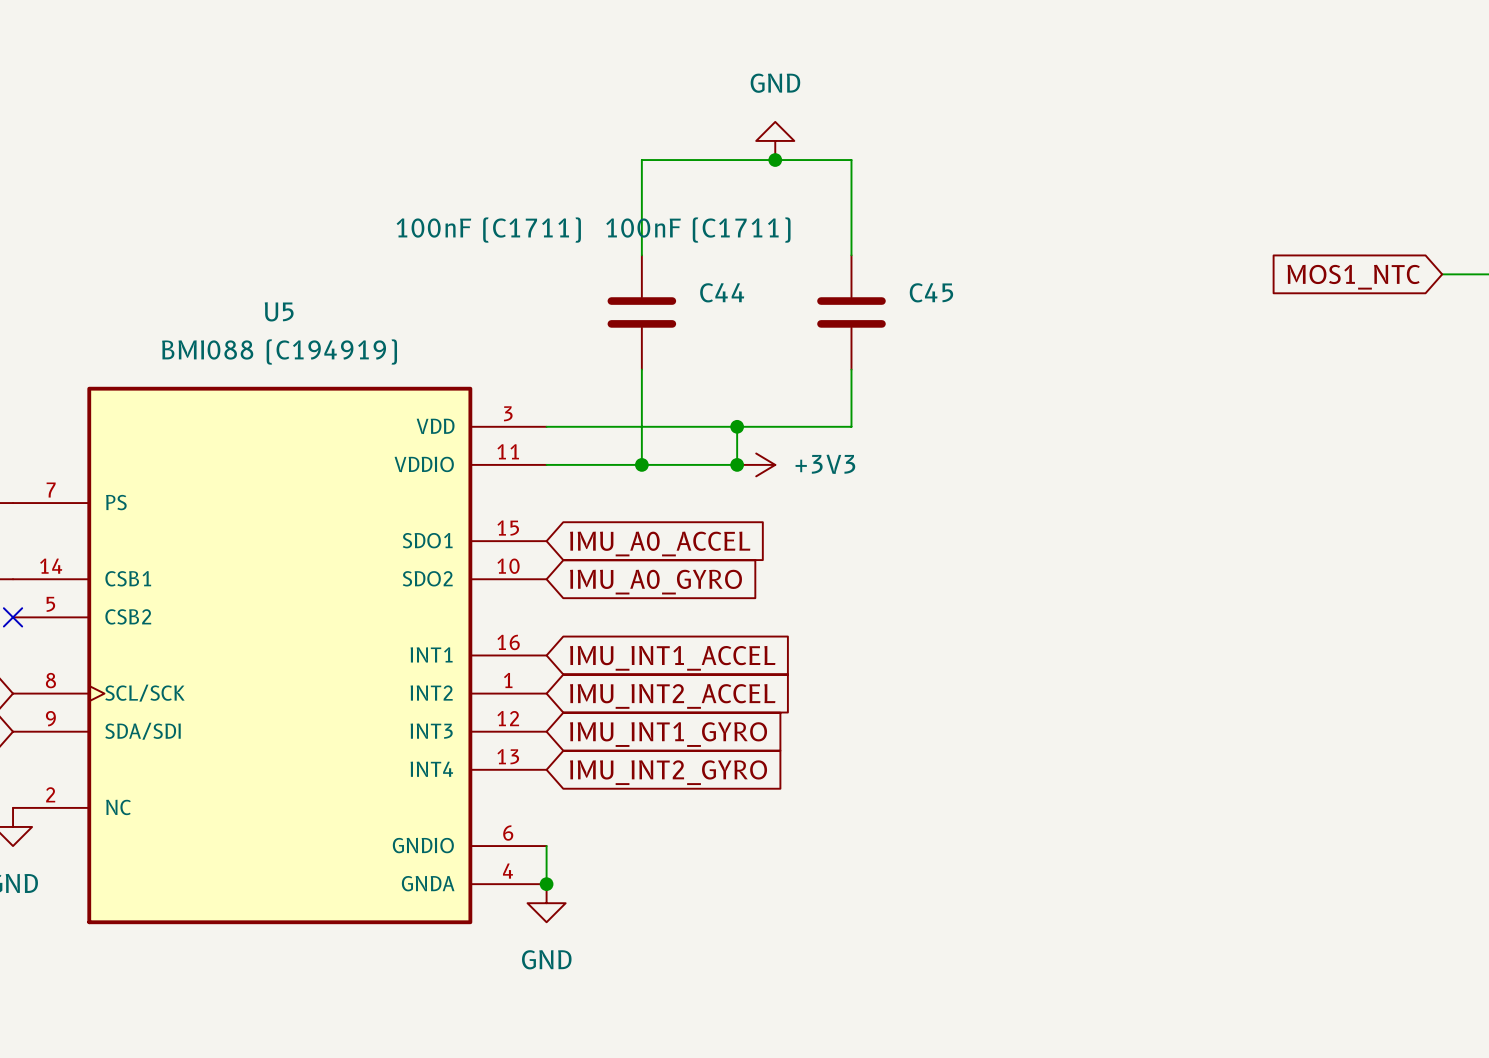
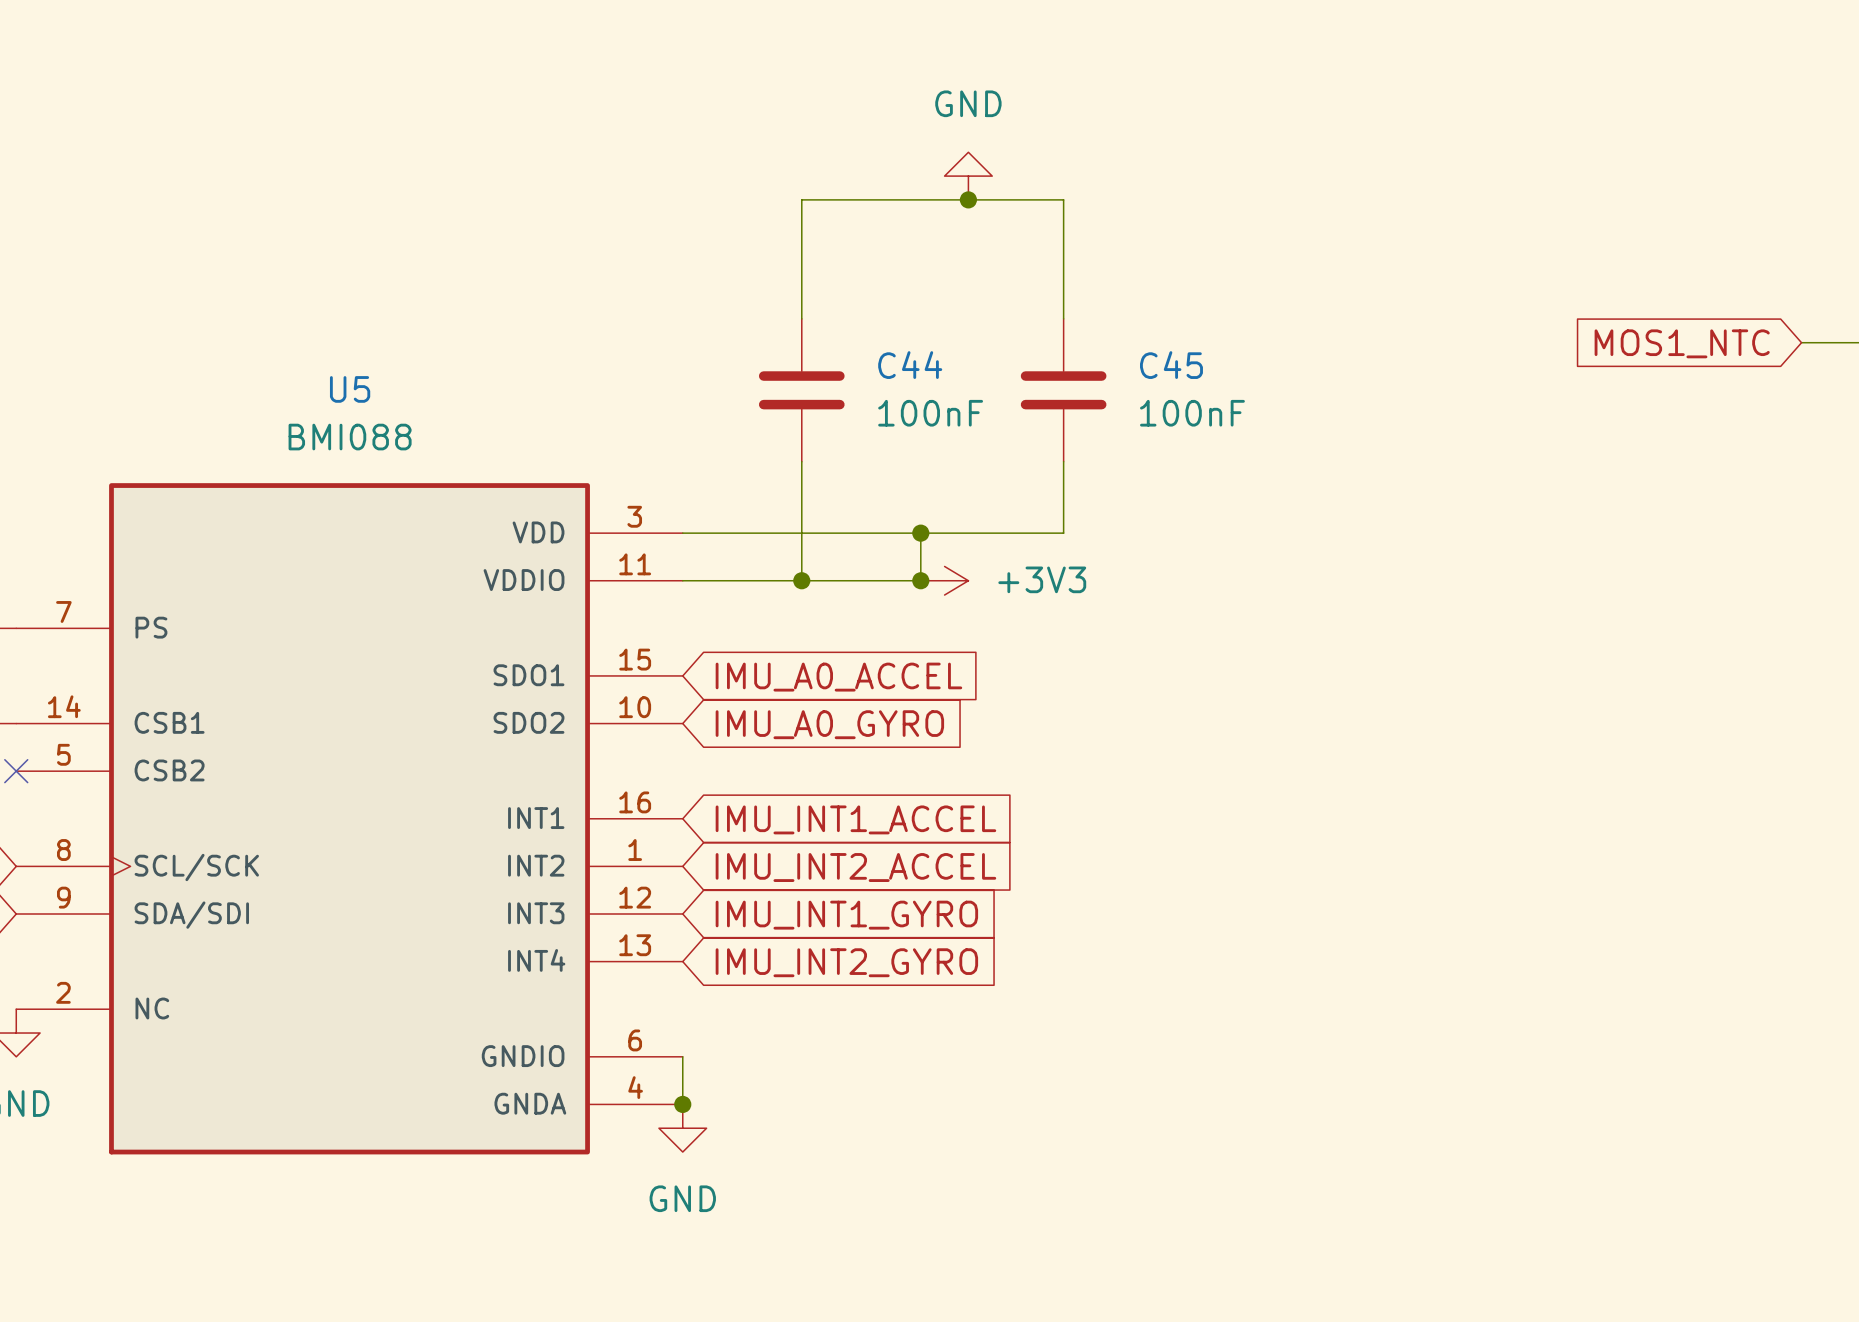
C44 value: 100nF (C1711) (488, 230) -> 100nF (930, 413)
C45 value: 100nF (C1711) (698, 230) -> 100nF (1192, 413)
U5 value: BMI088 (C194919) (279, 352) -> BMI088 (350, 437)

